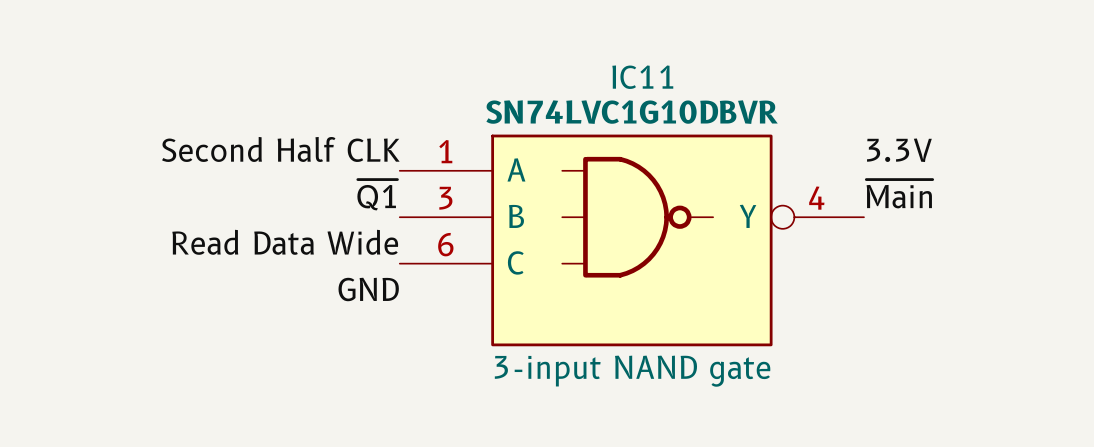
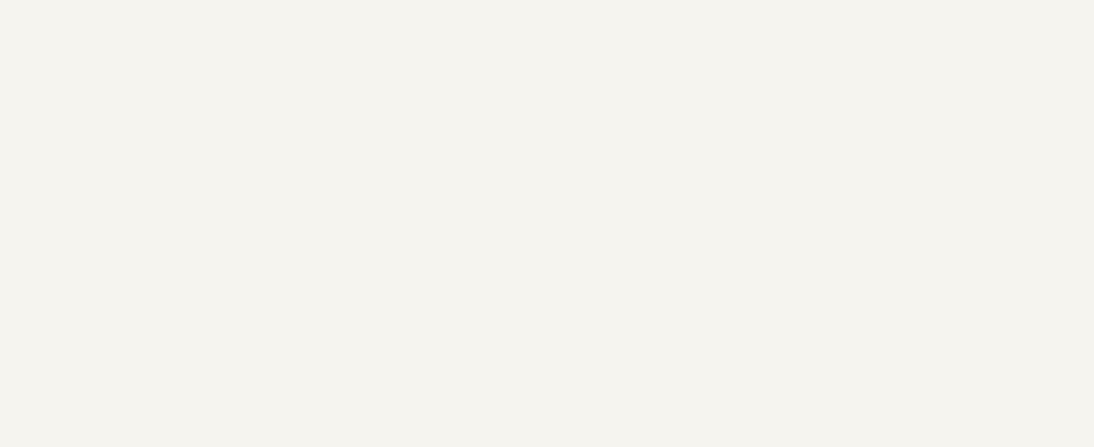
label: Second Half CLK (280, 149) -> none
label: 3.3V (899, 150) -> none
label: ~{Main} (899, 193) -> none
label: ~{Q1} (377, 194) -> none
IC11: SN74LVC1G10DBVR (631, 240) -> none
label: Read Data Wide (285, 242) -> none
label: GND (368, 289) -> none

